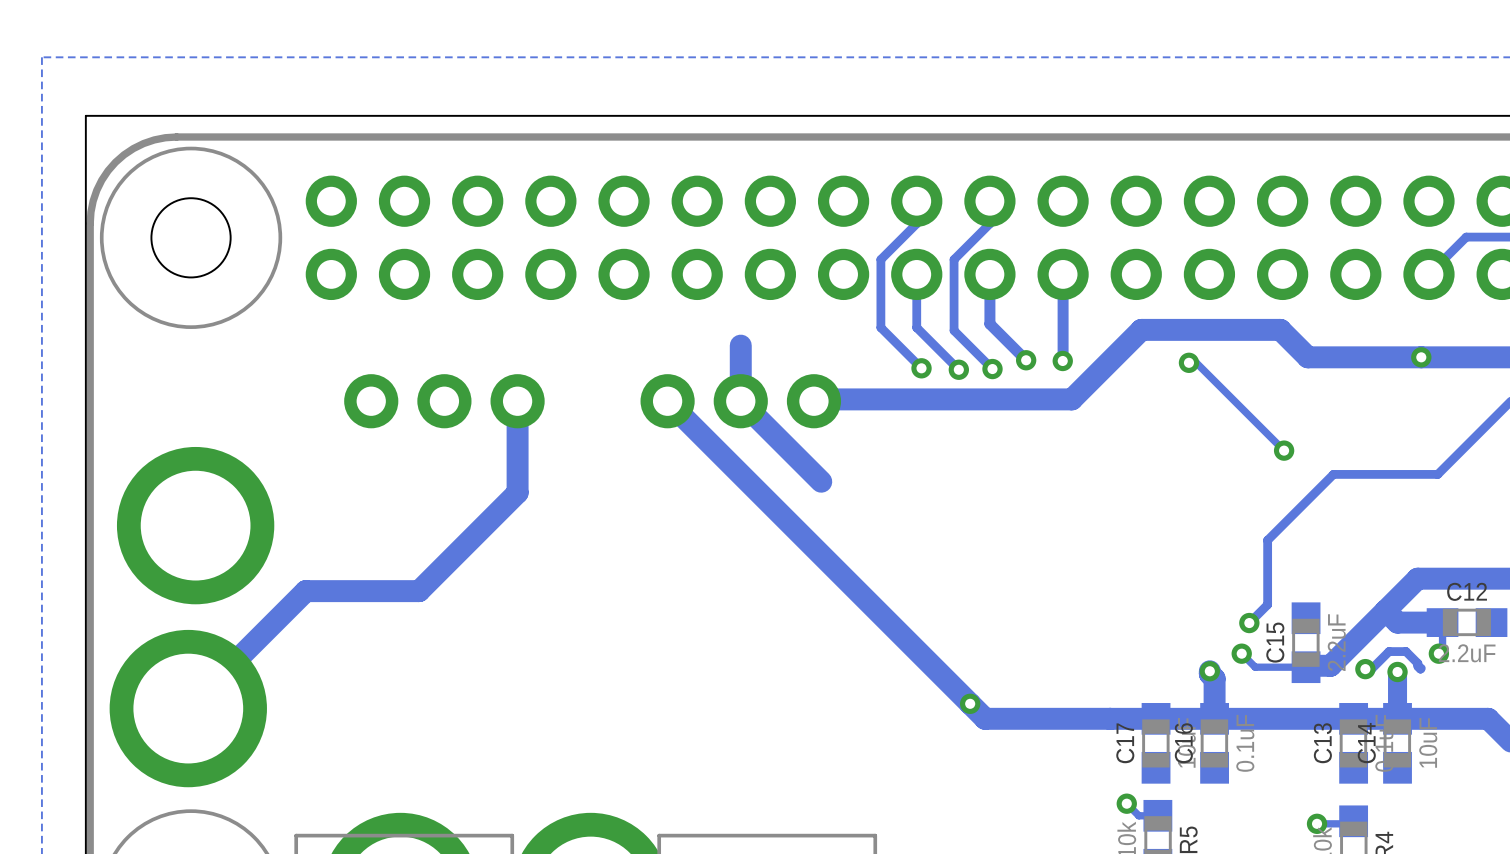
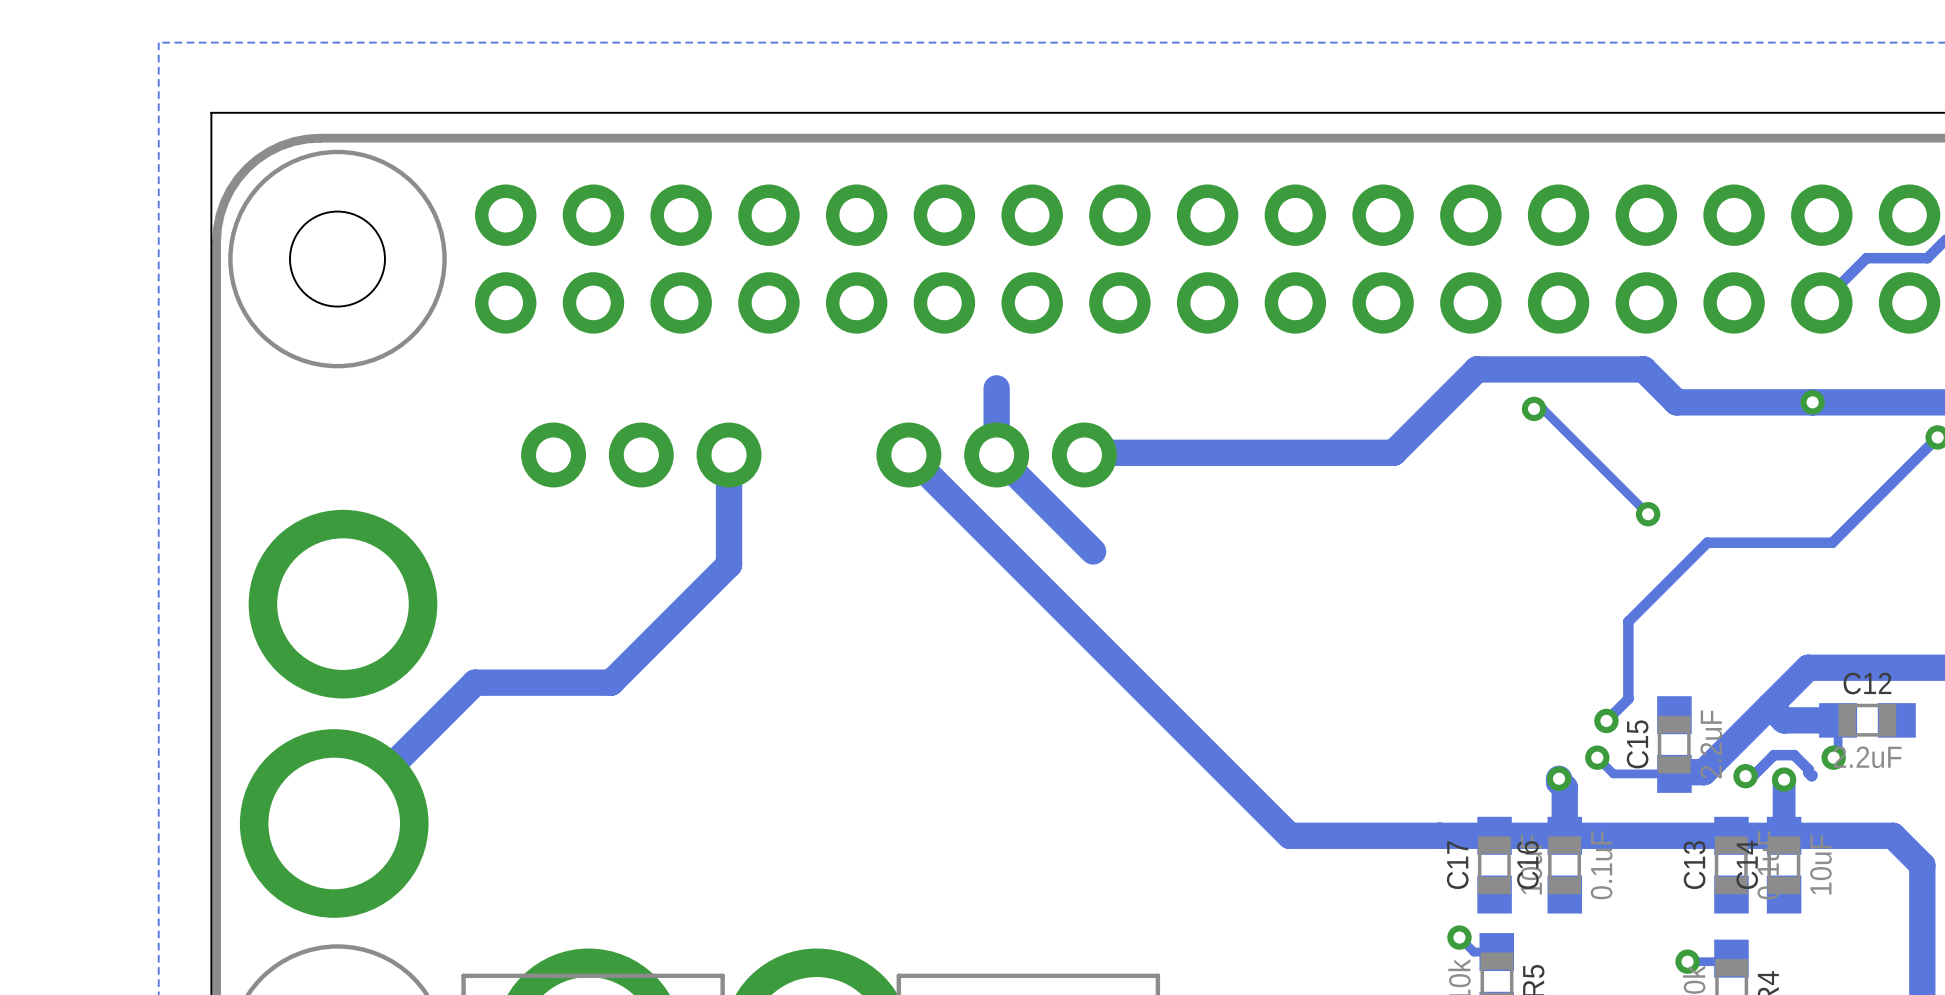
track: (916, 201) (916, 223) (880, 259) (880, 327) (921, 368) -> none
track: (989, 201) (989, 223) (954, 259) (954, 330) (992, 369) -> none
track: (916, 274) (916, 327) (958, 369) -> none
track: (989, 274) (989, 324) (1026, 360) -> none
track: (1063, 274) (1063, 360) -> none
via: (1026, 360) -> none
via: (1062, 360) -> none
via: (921, 368) -> none
via: (958, 369) -> none
via: (992, 369) -> none
via: (970, 703) -> none

